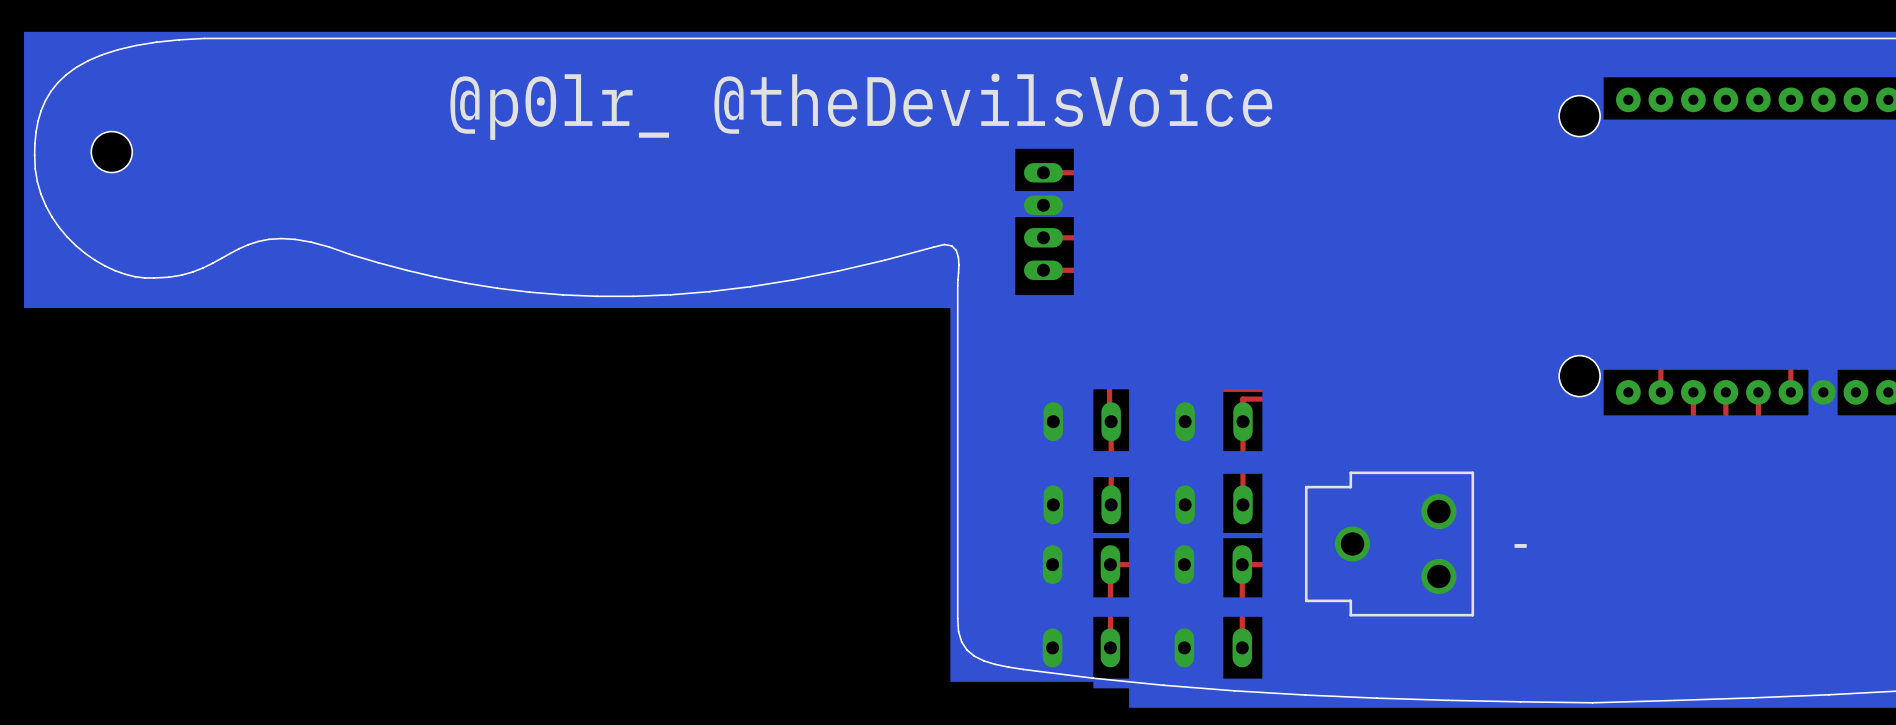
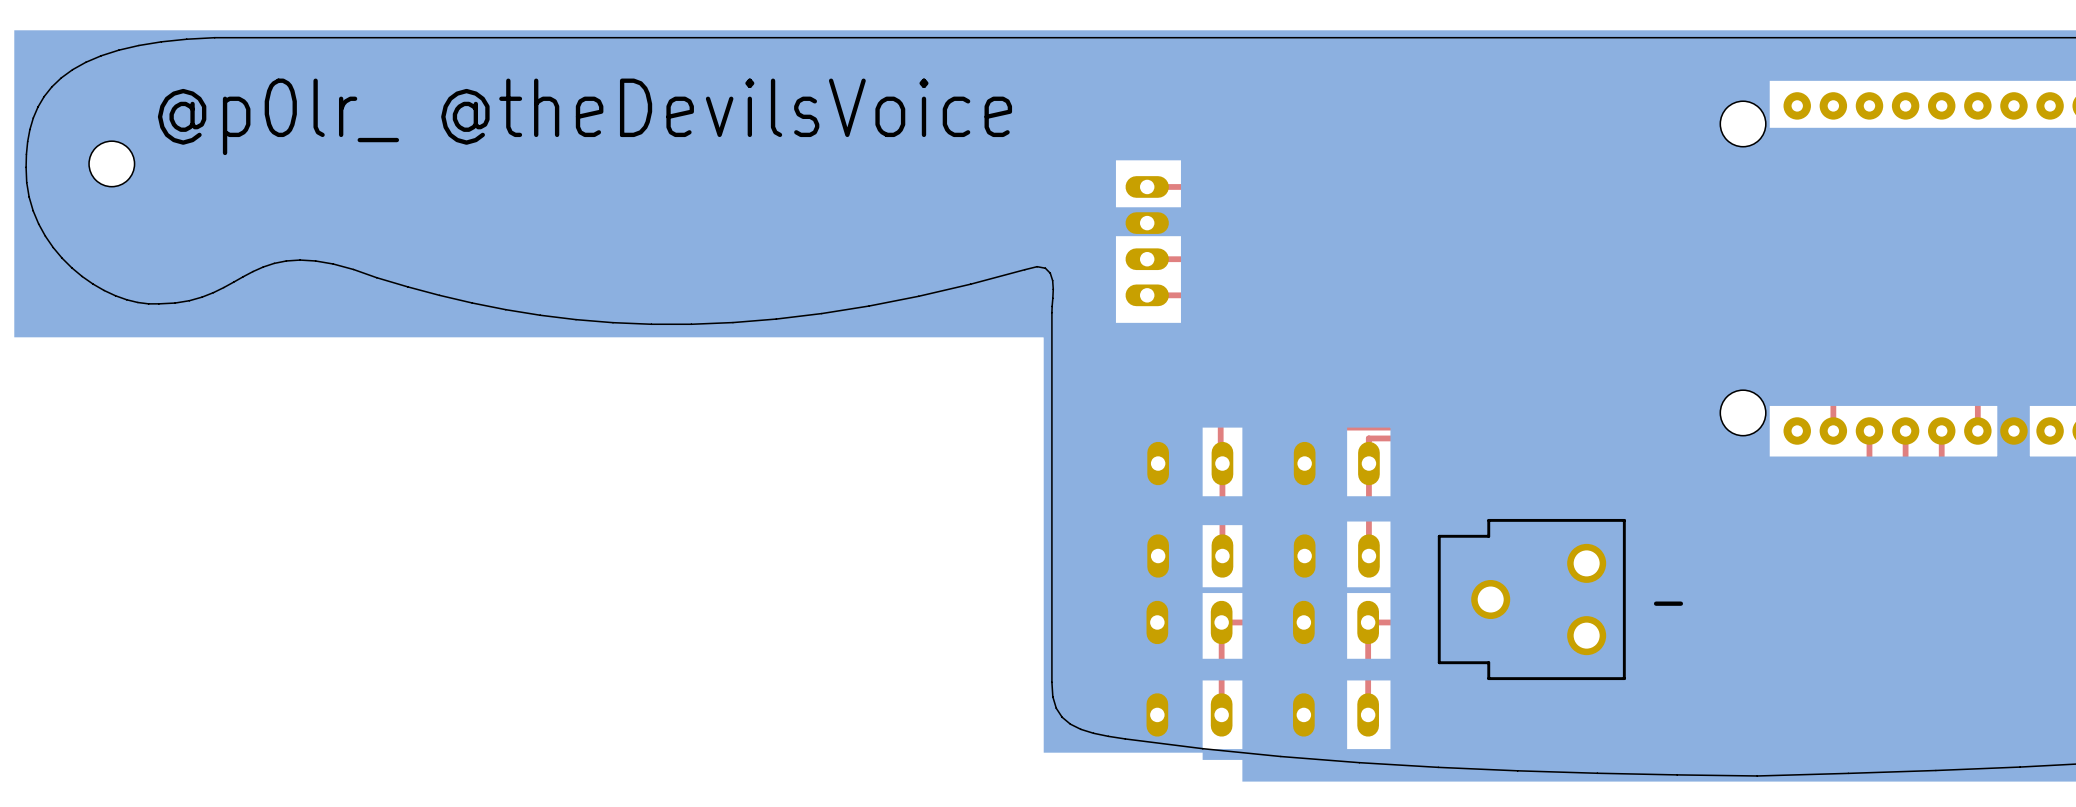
text position: @p0lr_ @theDevilsVoice (861, 106) -> @p0lr_ @theDevilsVoice (584, 116)

